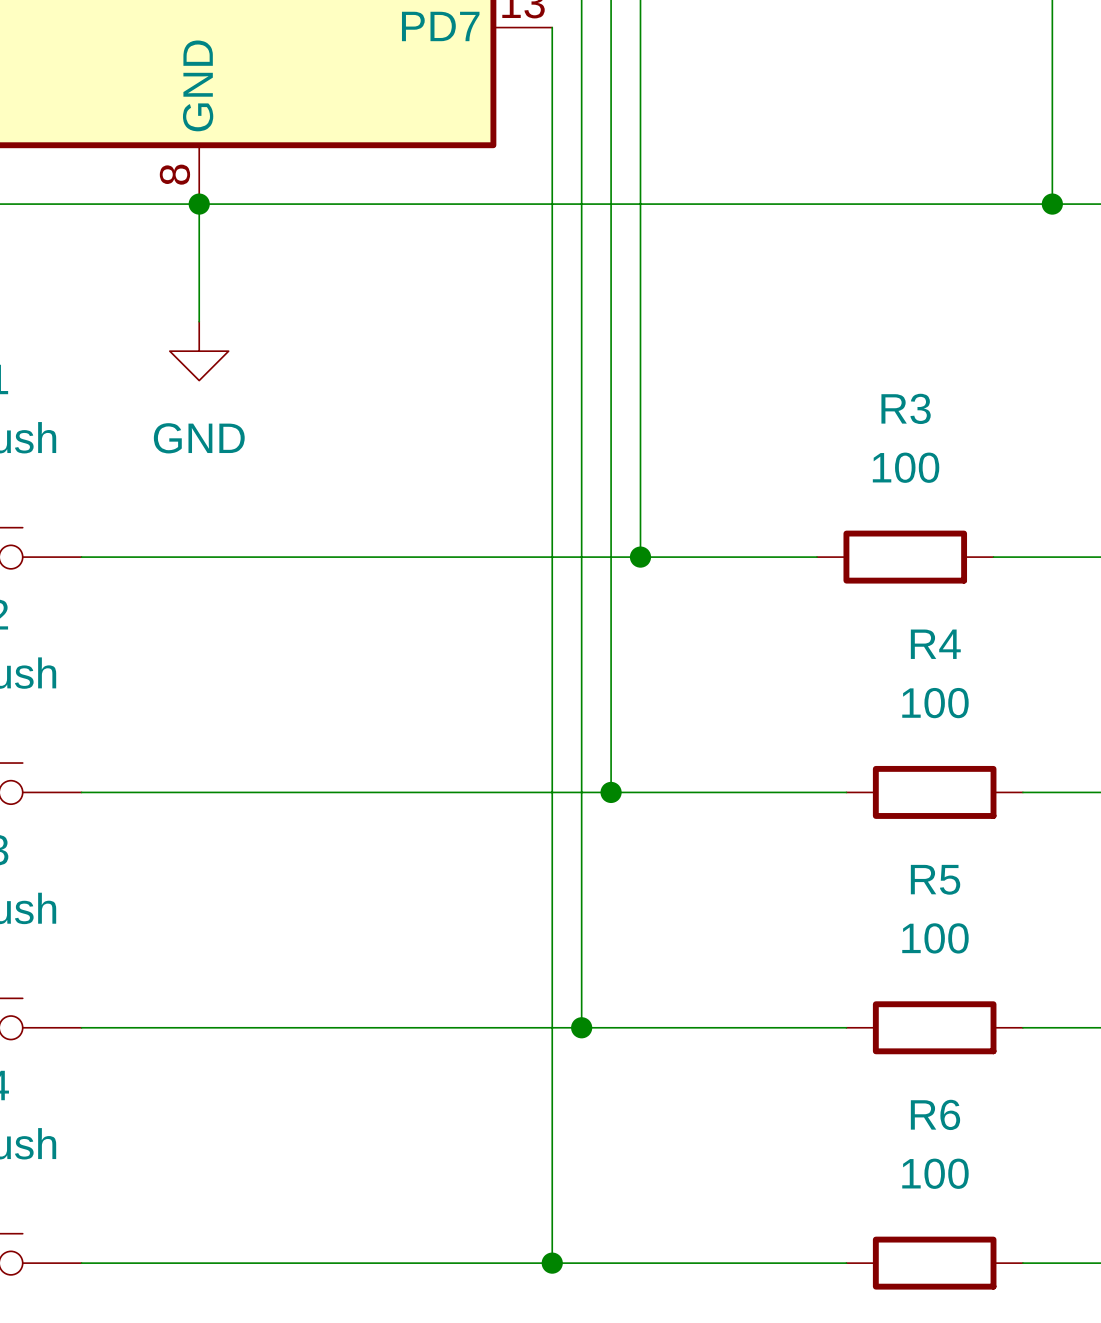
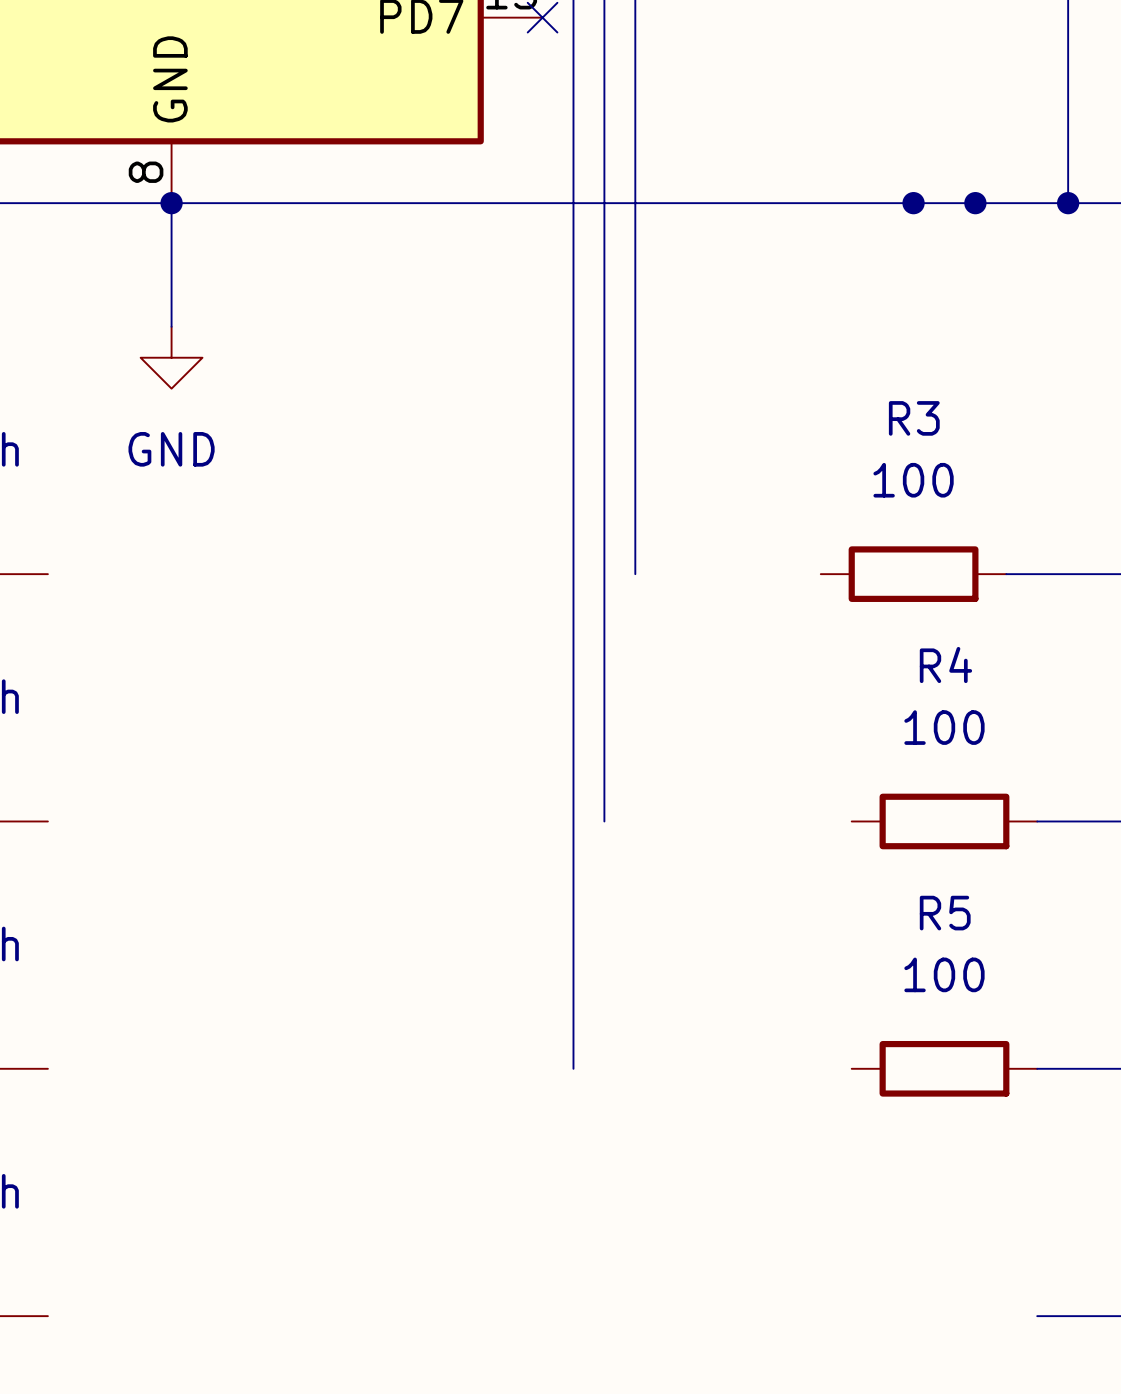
wire: (552, 27) (552, 1263) -> none
no-connect mark: none -> (542, 17)
junction: none -> (913, 203)
junction: none -> (975, 203)
wire: (81, 557) (817, 557) -> none
junction: (640, 557) -> none
wire: (81, 792) (846, 792) -> none
junction: (611, 792) -> none
wire: (81, 1027) (846, 1027) -> none
junction: (581, 1027) -> none
wire: (81, 1263) (846, 1263) -> none
junction: (552, 1263) -> none
R6: 100 (934, 1263) -> none

